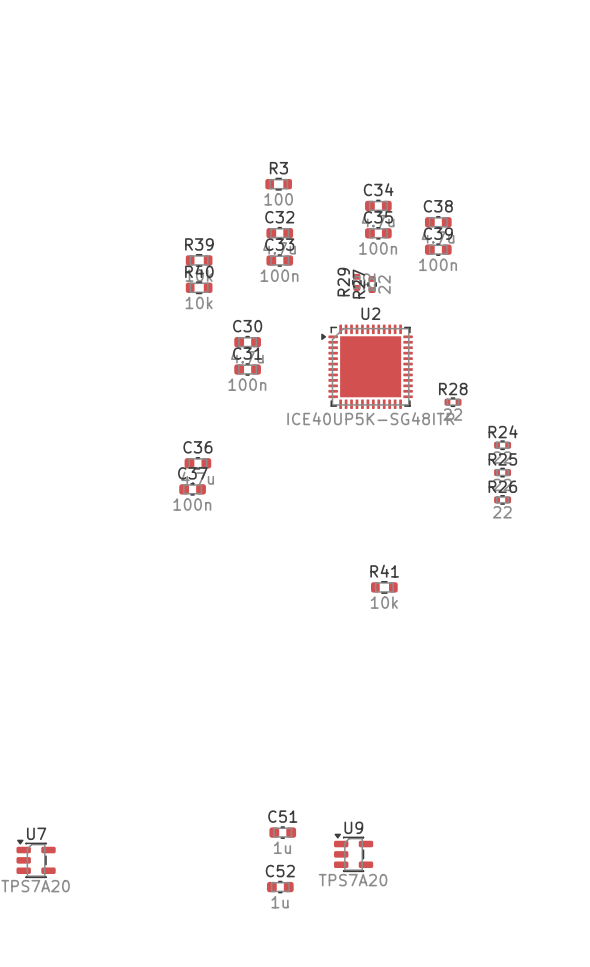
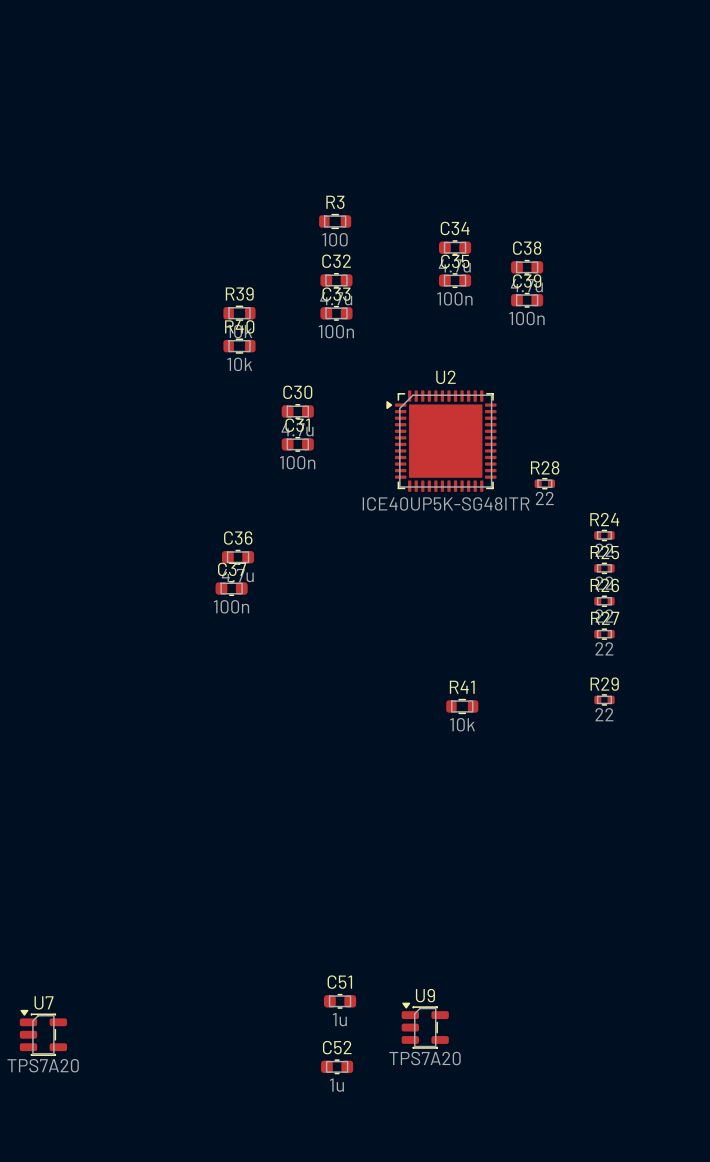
R29 rotation: 0° (356, 282) -> 90° clockwise (604, 699)
R29 position: (356, 282) -> (604, 699)
R27 rotation: 0° (372, 284) -> 90° clockwise (604, 634)
R27 position: (372, 284) -> (604, 634)

